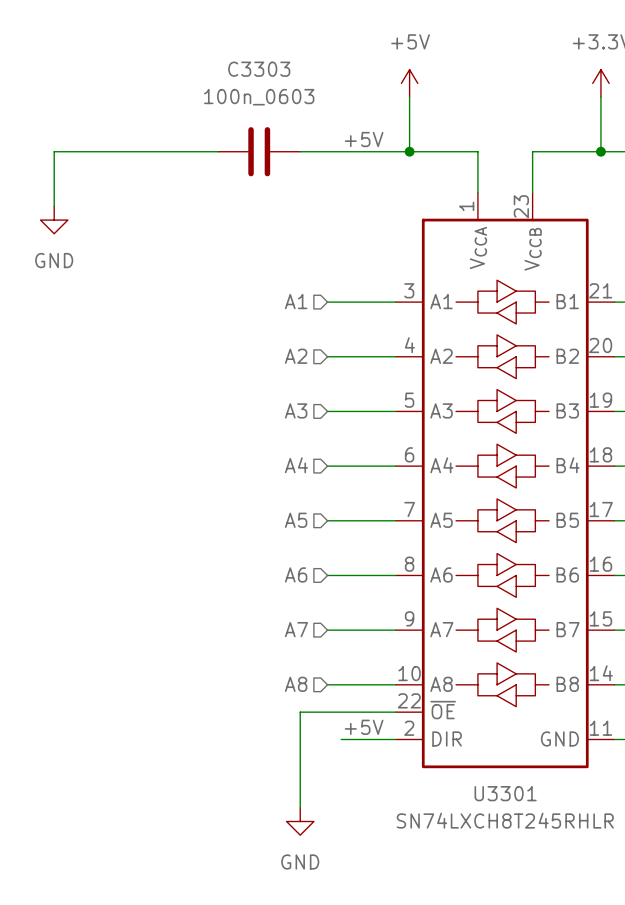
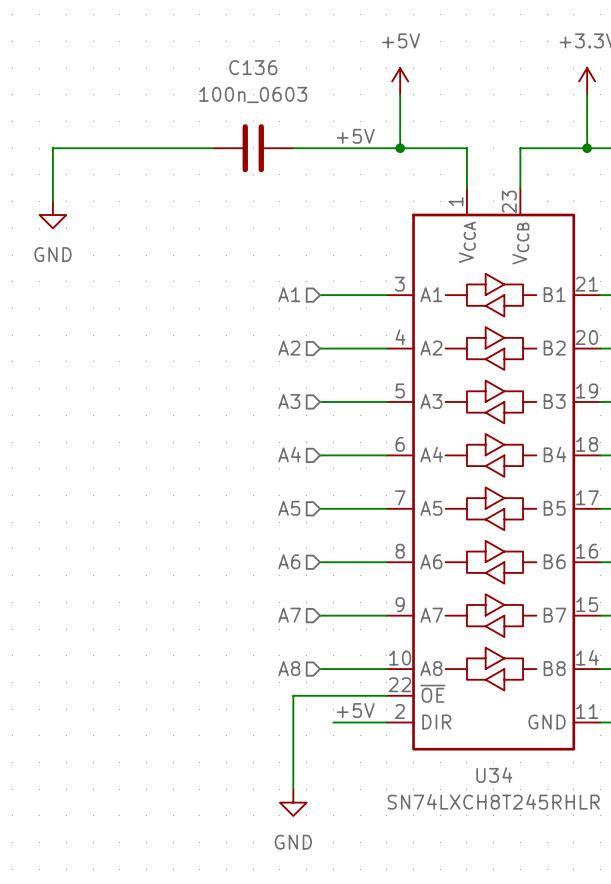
C3303 name: C3303 (259, 69) -> C136 (253, 67)
U3301 name: U3301 (505, 793) -> U34 (494, 775)

